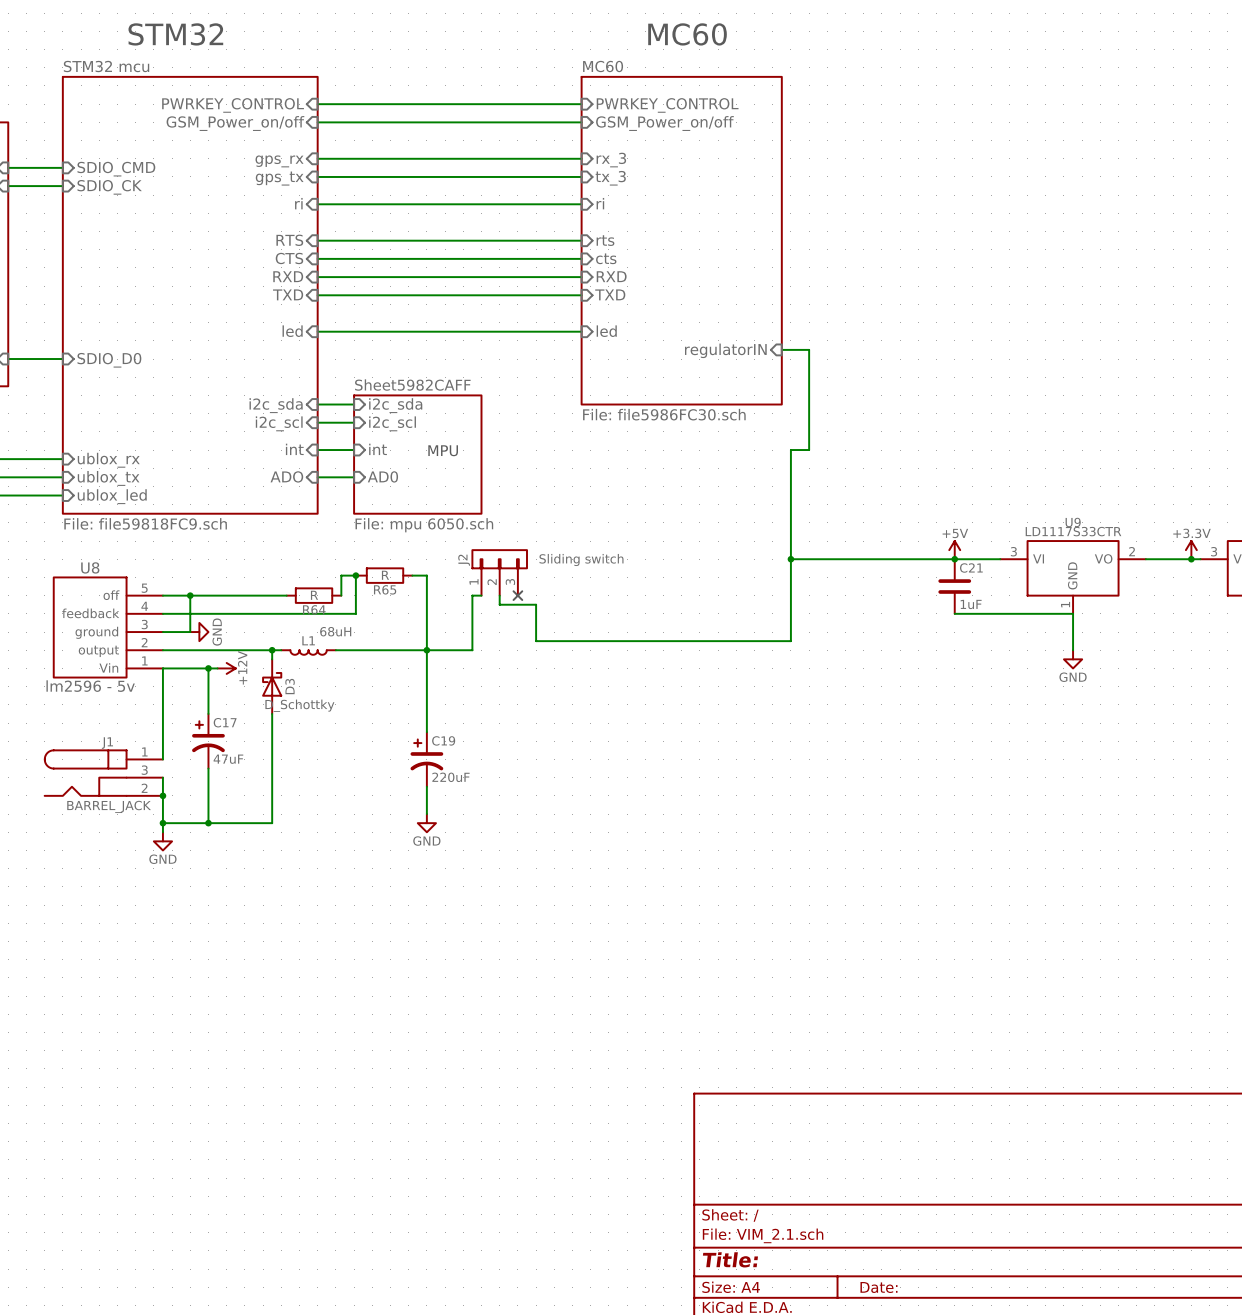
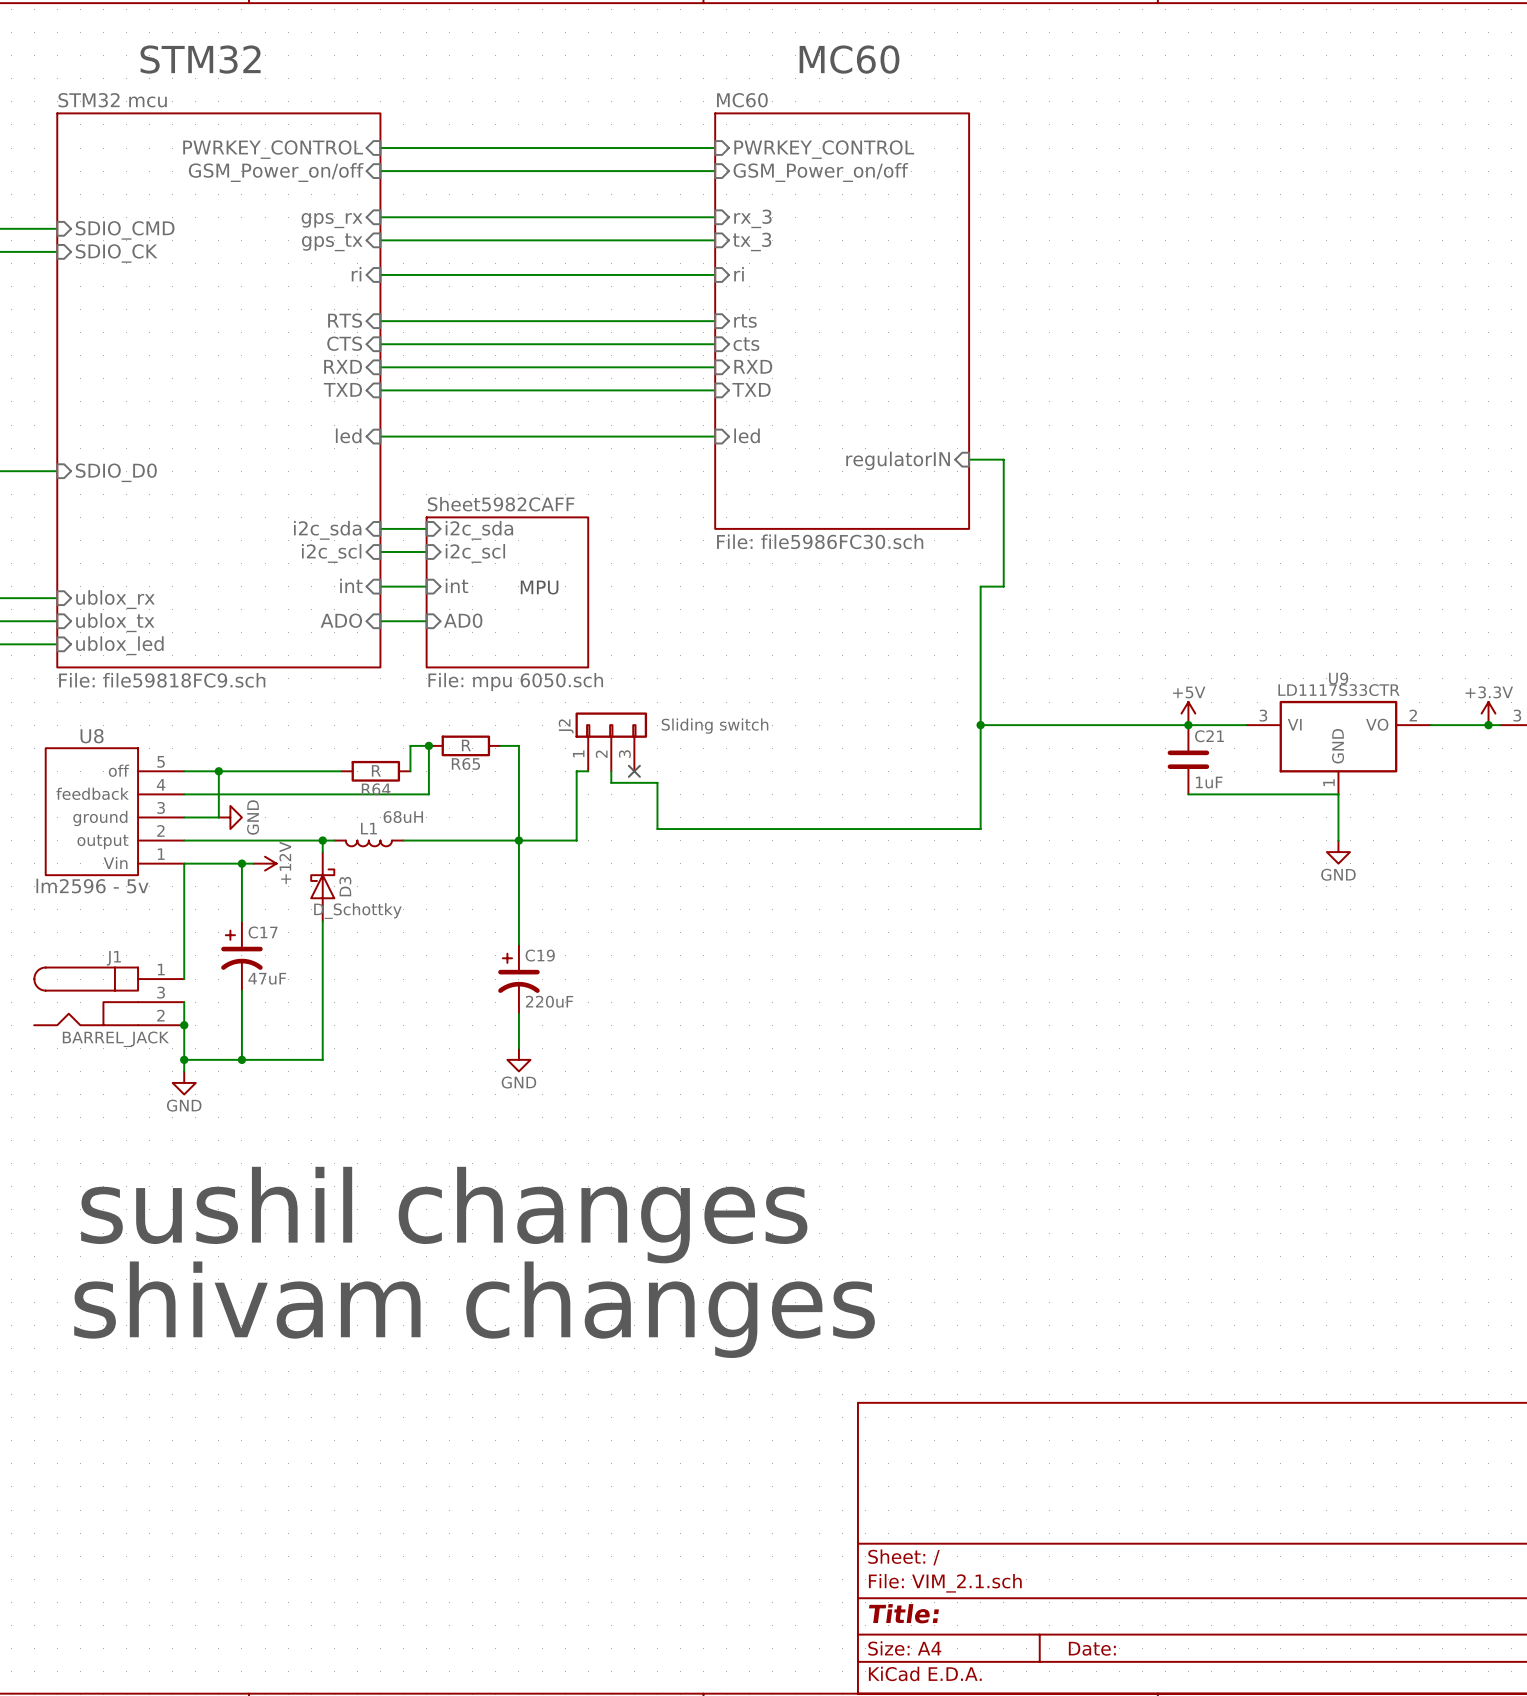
text: none -> sushil changes (444, 1215)
text: none -> shivam changes (474, 1309)

